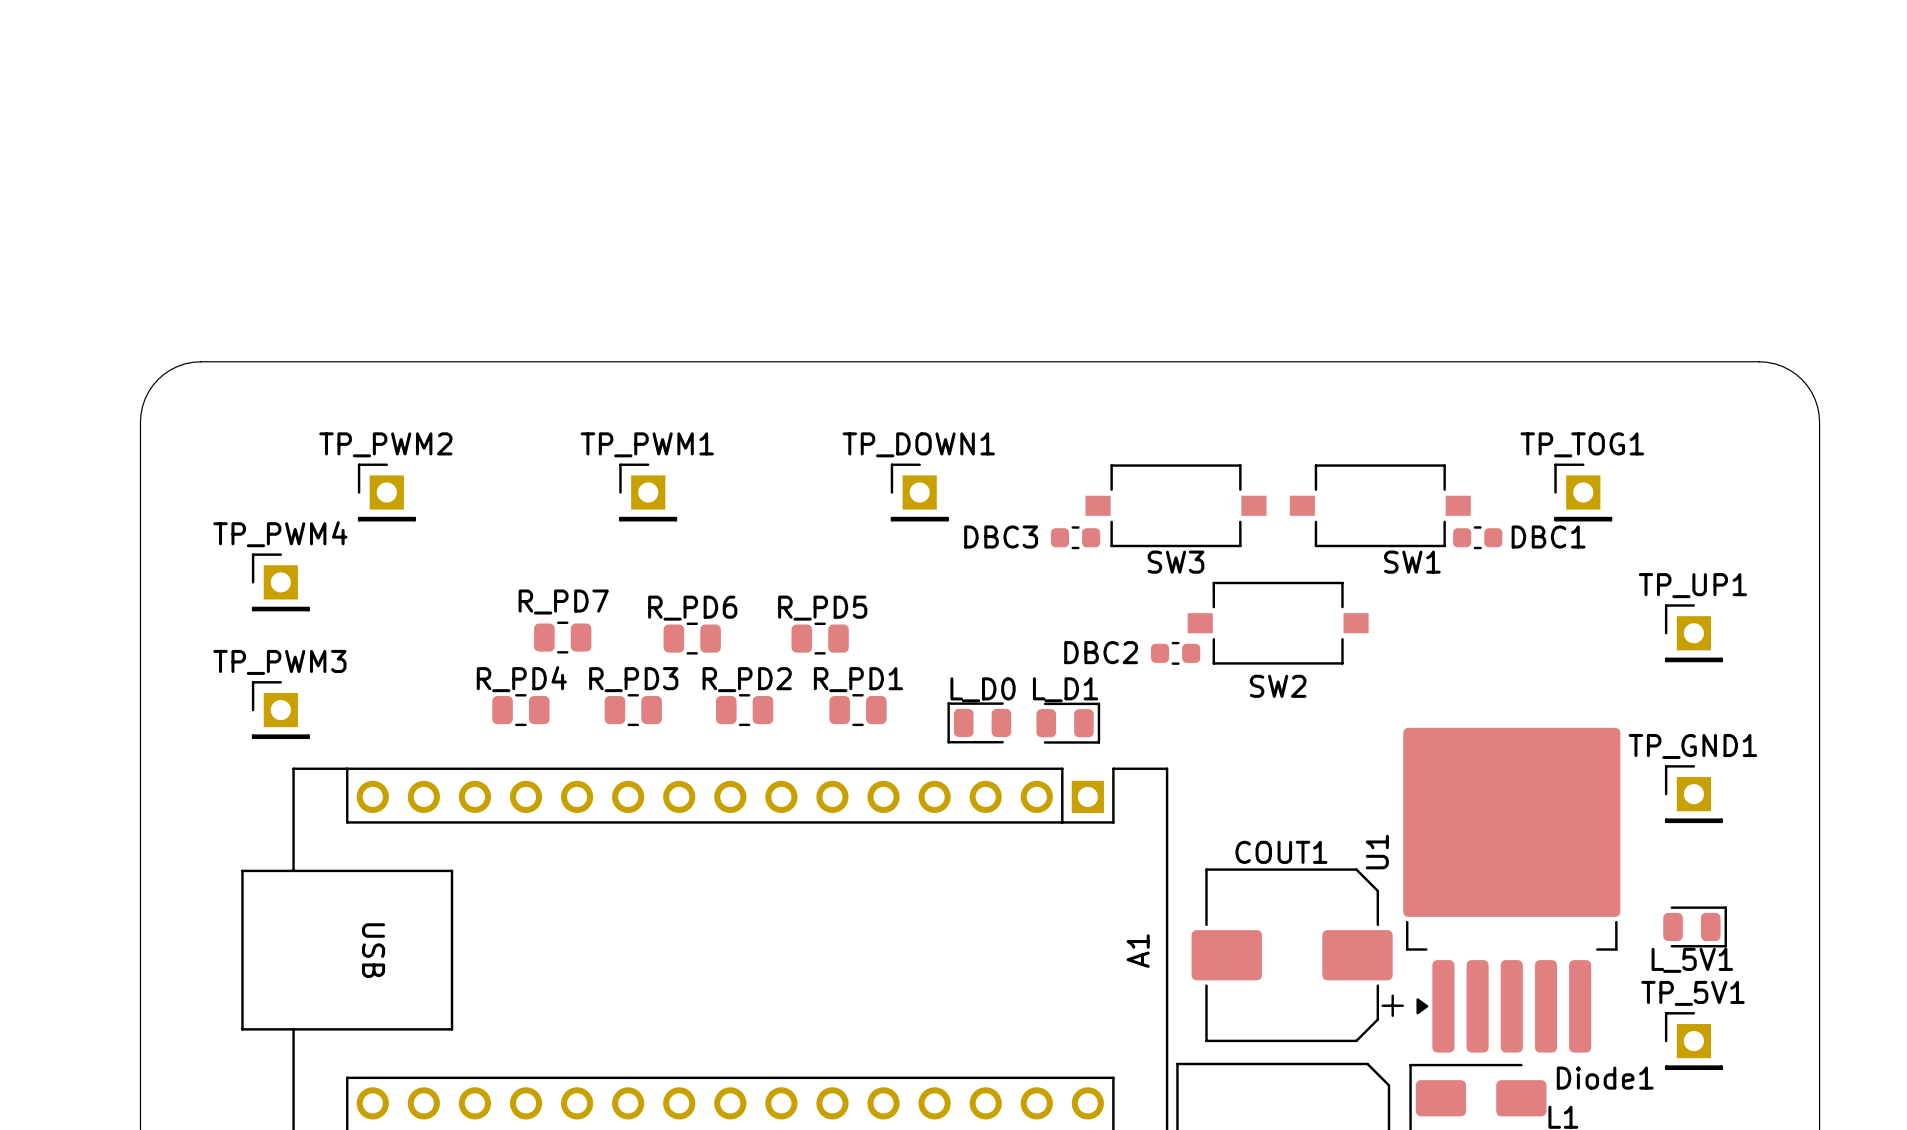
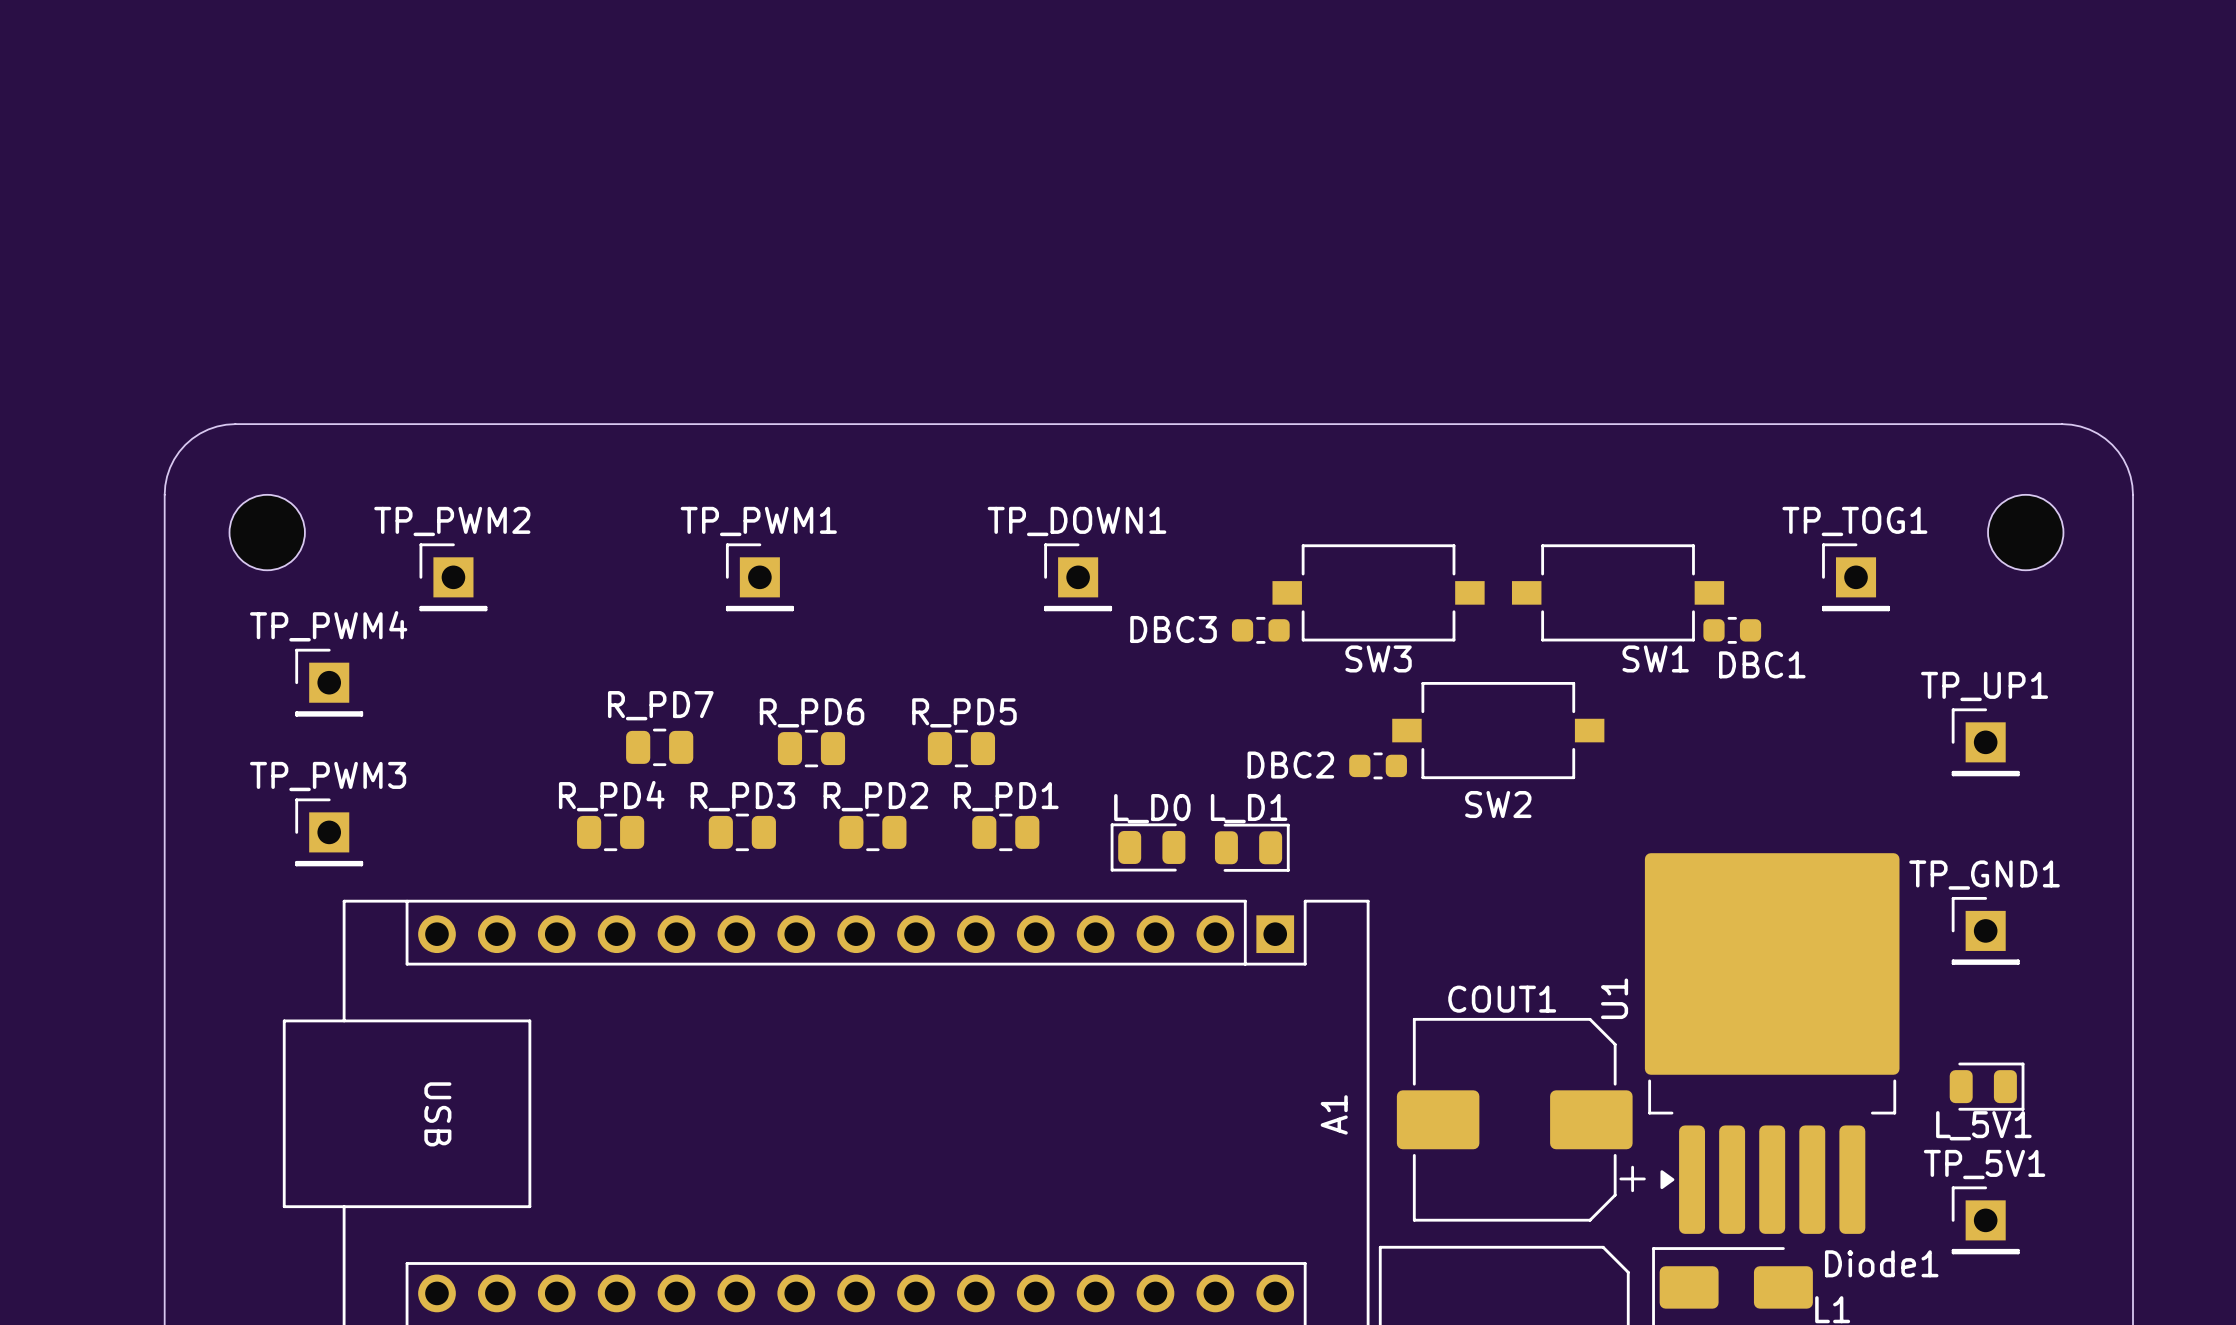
part: none -> (267, 532)
part: none -> (2025, 532)
DBC1 name position: DBC1 (1548, 536) -> DBC1 (1762, 664)

